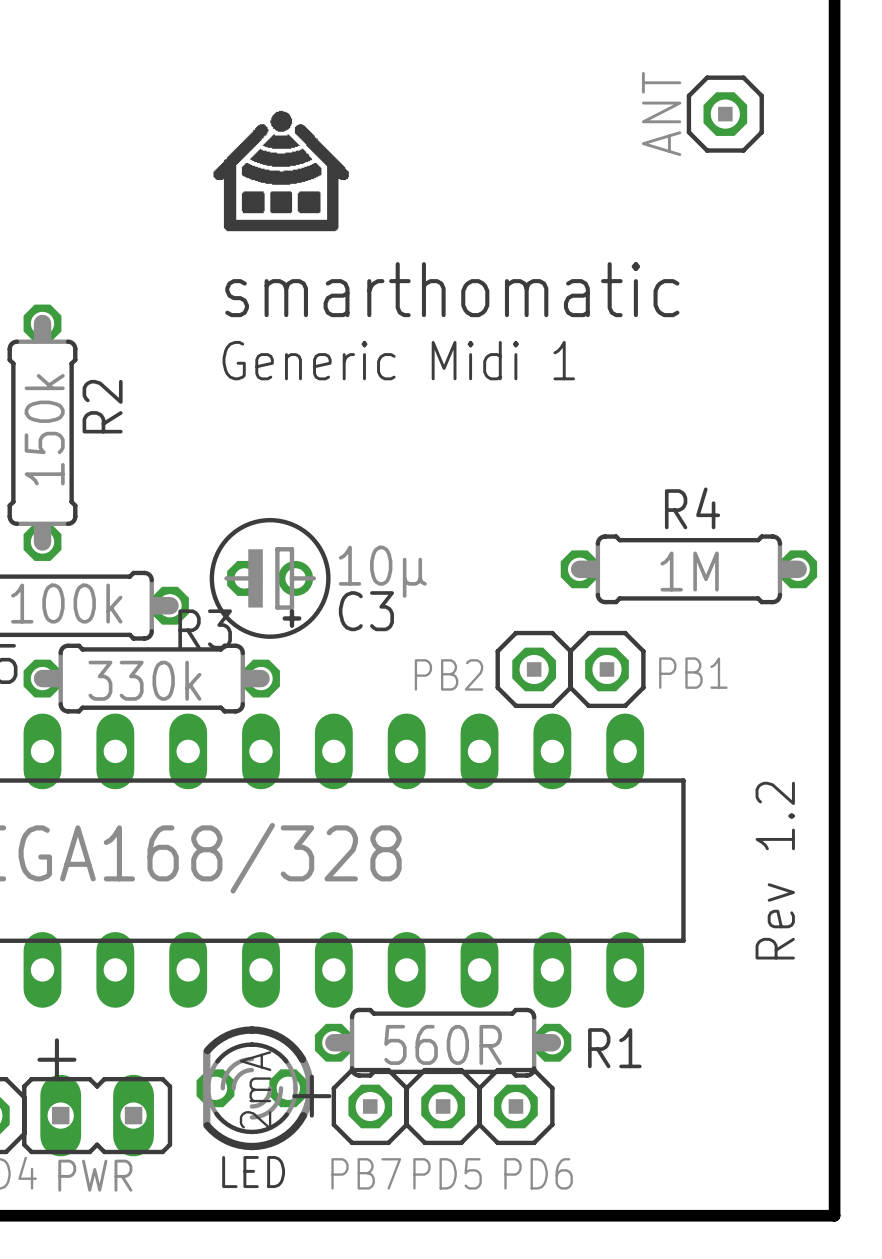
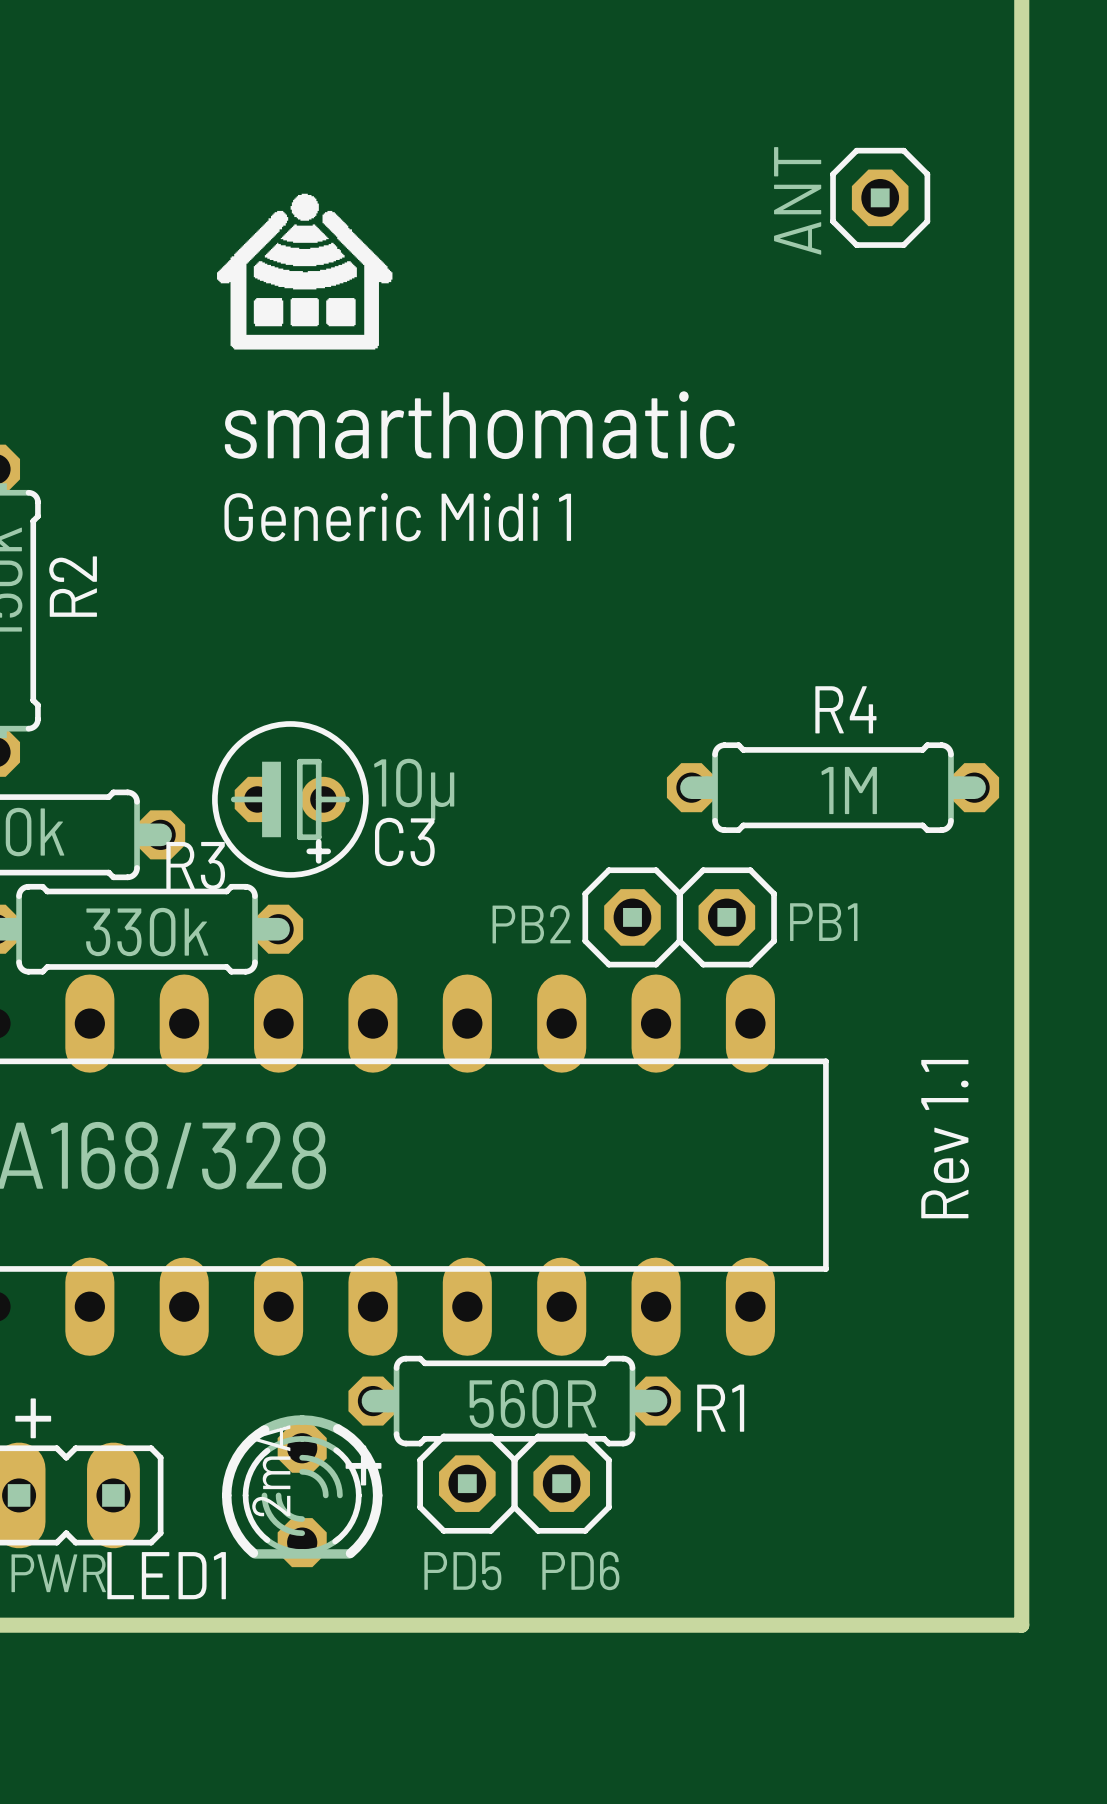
text: Rev 1.2 (775, 870) -> Rev 1.1 (945, 1139)
LED: (255, 1088) -> none
part: PB7 (370, 1106) -> none
part position: (443, 1106) -> (467, 1483)
part position: (515, 1106) -> (561, 1483)
LED1: none -> (302, 1491)

